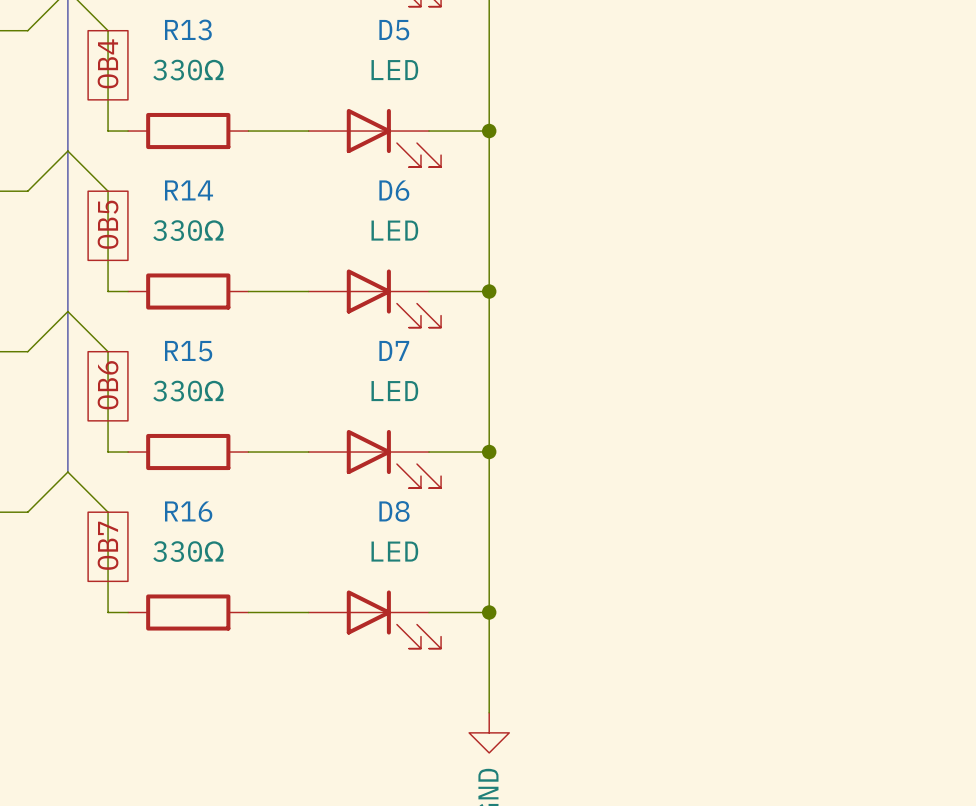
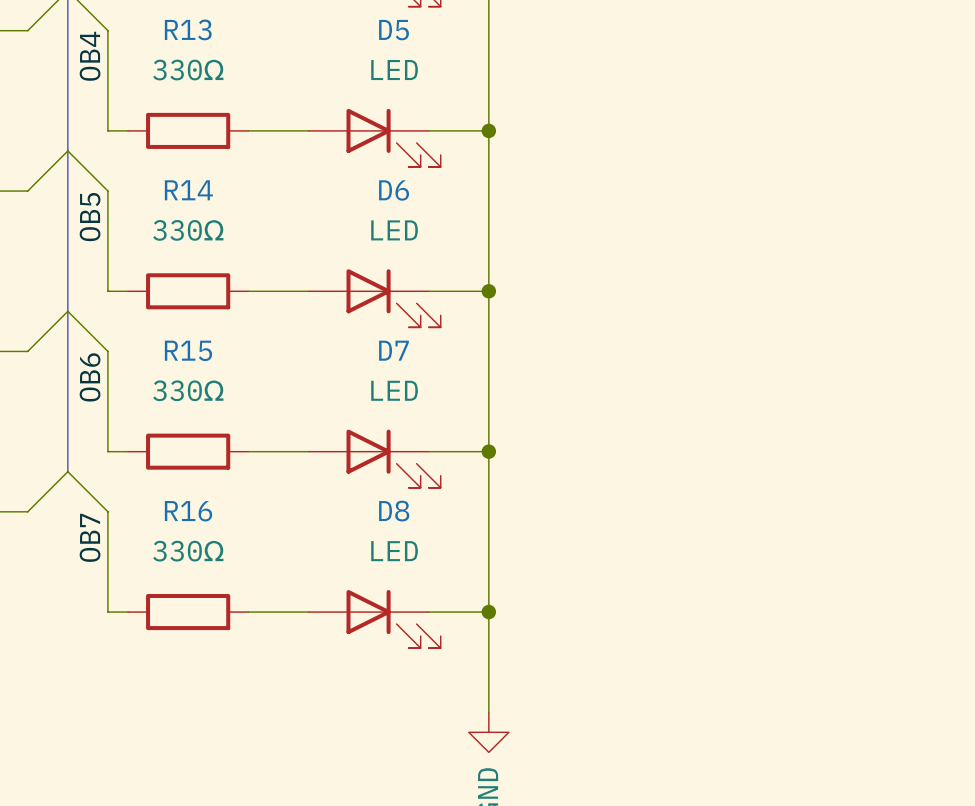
label: none -> OB4 (90, 56)
global label: OB4 (108, 63) -> none
label: none -> OB5 (90, 217)
global label: OB5 (108, 224) -> none
label: none -> OB6 (90, 377)
global label: OB6 (108, 385) -> none
label: none -> OB7 (90, 537)
global label: OB7 (108, 545) -> none

